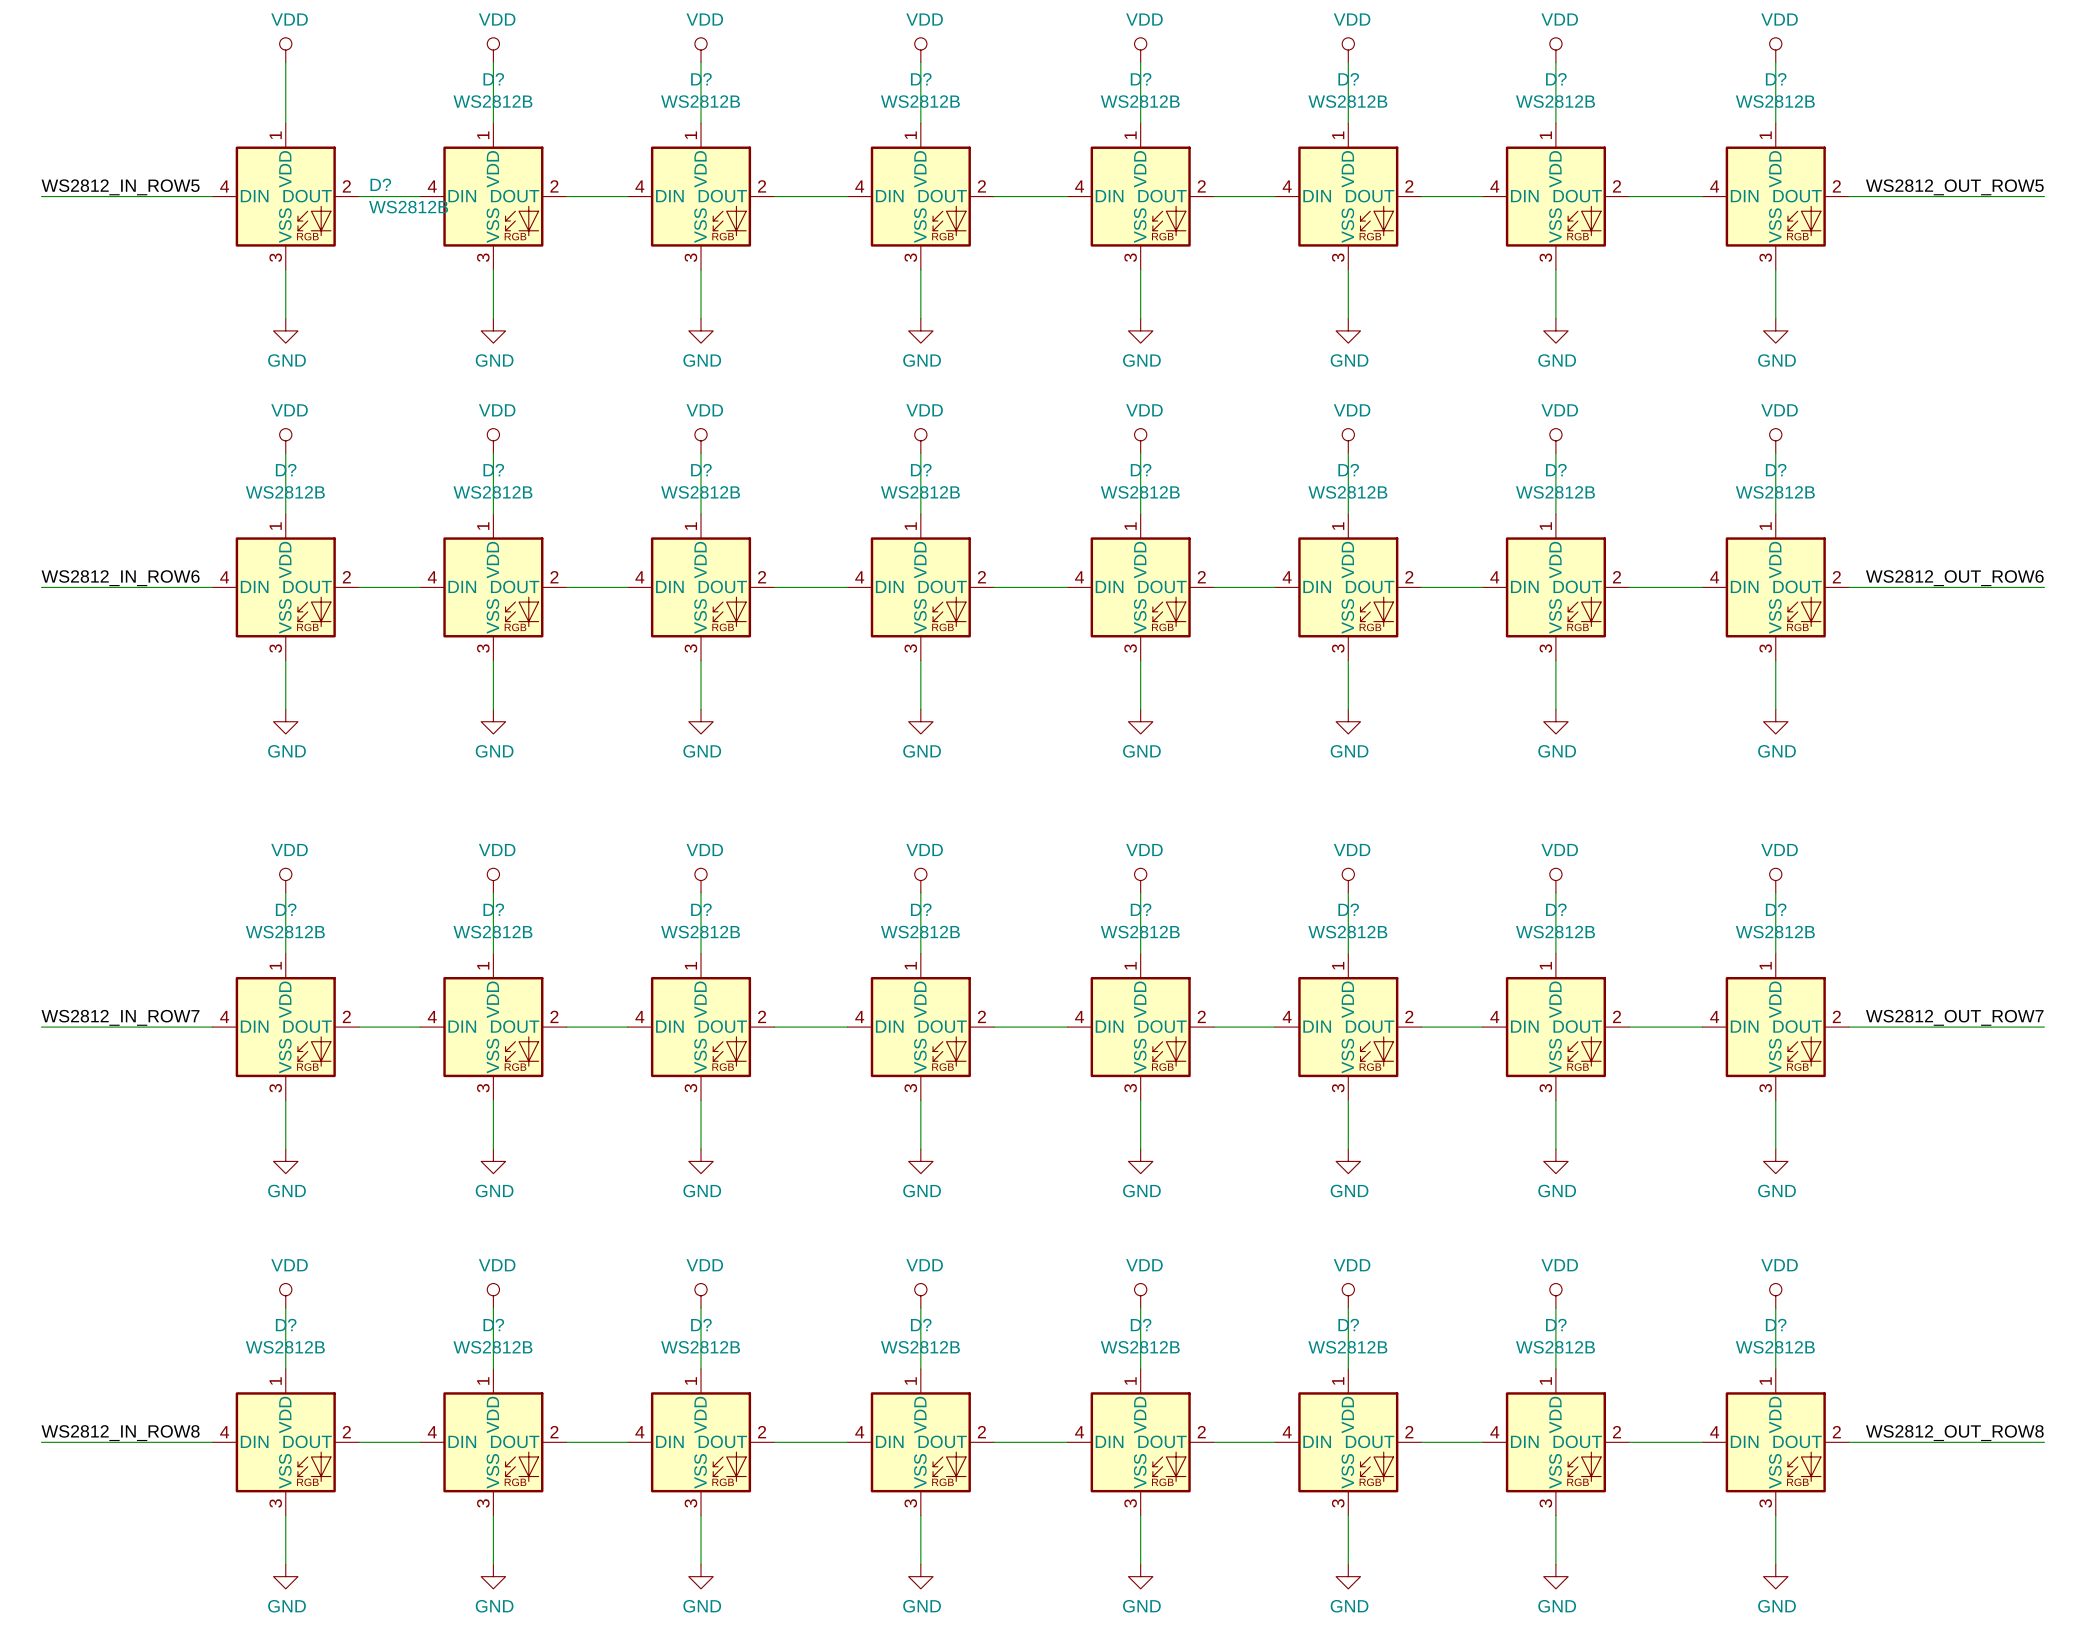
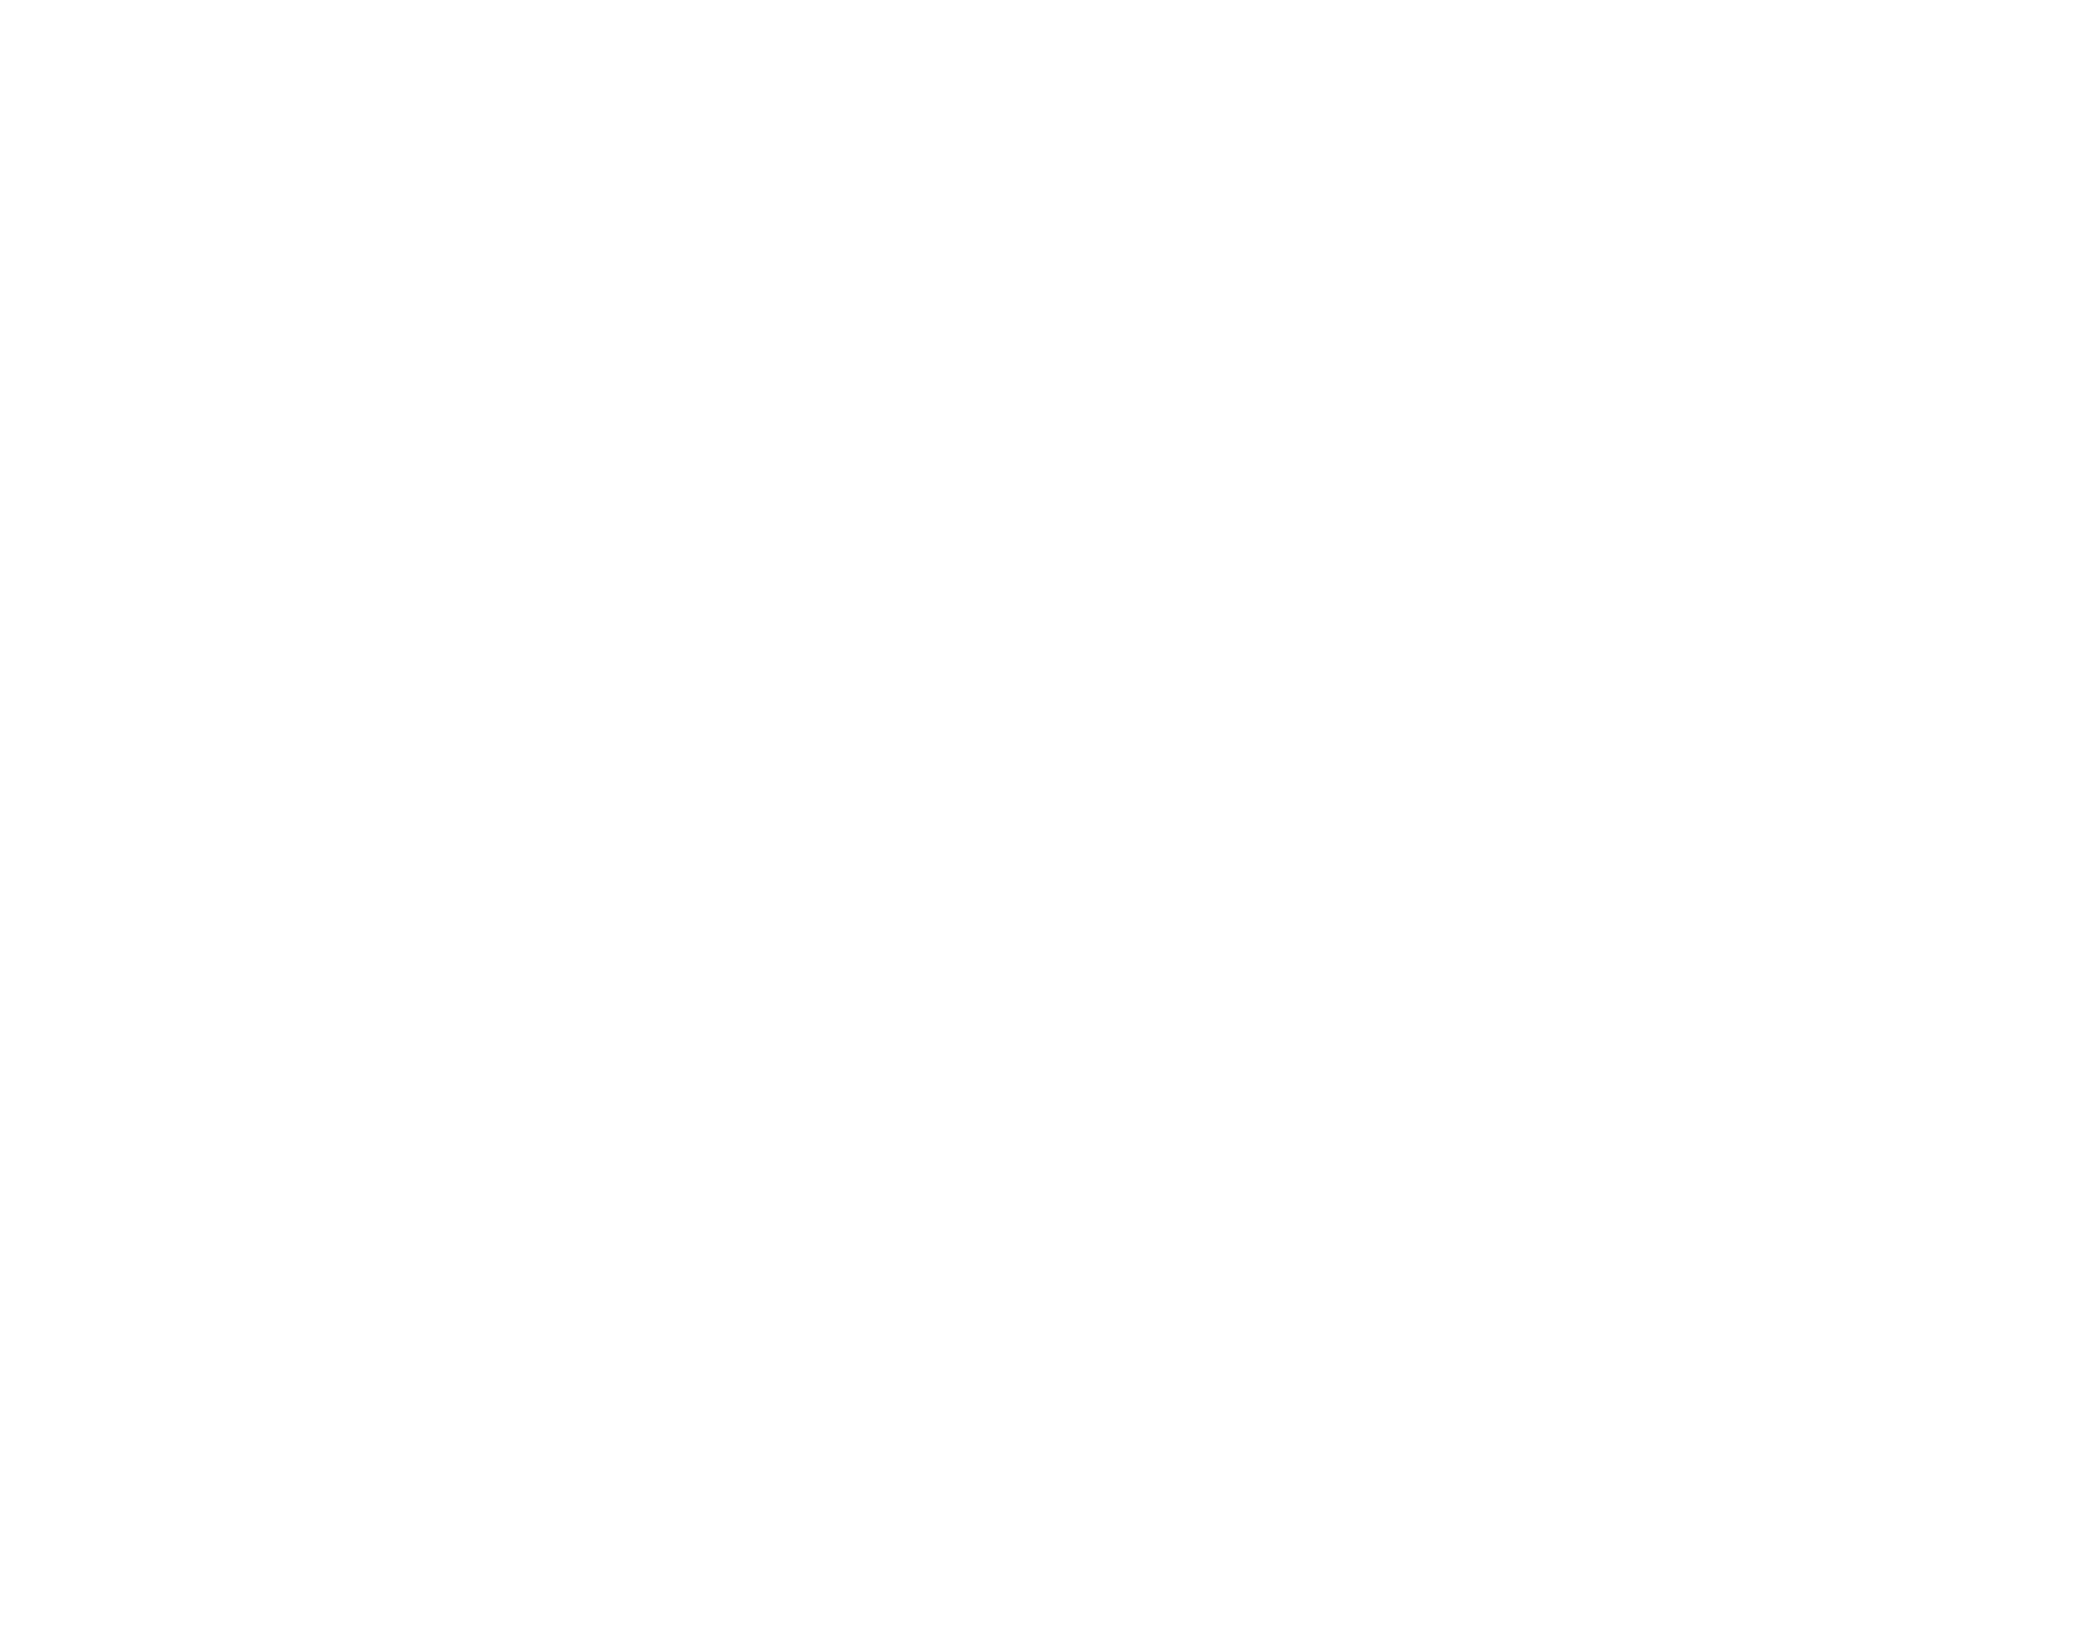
power symbol: VDD (285, 50) -> none
power symbol: VDD (493, 50) -> none
power symbol: VDD (701, 50) -> none
power symbol: VDD (920, 50) -> none
power symbol: VDD (1140, 50) -> none
power symbol: VDD (1348, 50) -> none
power symbol: VDD (1555, 50) -> none
power symbol: VDD (1775, 50) -> none
wire: (285, 62) (285, 123) -> none
wire: (493, 62) (493, 123) -> none
wire: (701, 62) (701, 123) -> none
wire: (920, 62) (920, 123) -> none
wire: (1140, 62) (1140, 123) -> none
wire: (1348, 62) (1348, 123) -> none
wire: (1555, 62) (1555, 123) -> none
wire: (1775, 62) (1775, 123) -> none
label: WS2812_IN_ROW5 (120, 187) -> none
label: WS2812_OUT_ROW5 (1954, 187) -> none
wire: (41, 196) (212, 196) -> none
D?: WS2812B (285, 196) -> none
wire: (359, 196) (420, 196) -> none
D?: WS2812B (493, 196) -> none
wire: (566, 196) (627, 196) -> none
D?: WS2812B (701, 196) -> none
wire: (774, 196) (847, 196) -> none
D?: WS2812B (920, 196) -> none
wire: (994, 196) (1067, 196) -> none
D?: WS2812B (1140, 196) -> none
wire: (1213, 196) (1275, 196) -> none
D?: WS2812B (1348, 196) -> none
wire: (1421, 196) (1482, 196) -> none
D?: WS2812B (1555, 196) -> none
wire: (1629, 196) (1702, 196) -> none
D?: WS2812B (1775, 196) -> none
wire: (1849, 196) (2044, 196) -> none
wire: (285, 269) (285, 318) -> none
wire: (493, 269) (493, 318) -> none
wire: (701, 269) (701, 318) -> none
wire: (920, 269) (920, 318) -> none
wire: (1140, 269) (1140, 318) -> none
wire: (1348, 269) (1348, 318) -> none
wire: (1555, 269) (1555, 318) -> none
wire: (1775, 269) (1775, 318) -> none
power symbol: GND (285, 330) -> none
power symbol: GND (493, 330) -> none
power symbol: GND (701, 330) -> none
power symbol: GND (920, 330) -> none
power symbol: GND (1140, 330) -> none
power symbol: GND (1348, 330) -> none
power symbol: GND (1555, 330) -> none
power symbol: GND (1775, 330) -> none
power symbol: VDD (285, 440) -> none
power symbol: VDD (493, 440) -> none
power symbol: VDD (701, 440) -> none
power symbol: VDD (920, 440) -> none
power symbol: VDD (1140, 440) -> none
power symbol: VDD (1348, 440) -> none
power symbol: VDD (1555, 440) -> none
power symbol: VDD (1775, 440) -> none
wire: (285, 453) (285, 514) -> none
wire: (493, 453) (493, 514) -> none
wire: (701, 453) (701, 514) -> none
wire: (920, 453) (920, 514) -> none
wire: (1140, 453) (1140, 514) -> none
wire: (1348, 453) (1348, 514) -> none
wire: (1555, 453) (1555, 514) -> none
wire: (1775, 453) (1775, 514) -> none
label: WS2812_IN_ROW6 (120, 578) -> none
label: WS2812_OUT_ROW6 (1954, 578) -> none
wire: (41, 587) (212, 587) -> none
D?: WS2812B (285, 587) -> none
wire: (359, 587) (420, 587) -> none
D?: WS2812B (493, 587) -> none
wire: (566, 587) (627, 587) -> none
D?: WS2812B (701, 587) -> none
wire: (774, 587) (847, 587) -> none
D?: WS2812B (920, 587) -> none
wire: (994, 587) (1067, 587) -> none
D?: WS2812B (1140, 587) -> none
wire: (1213, 587) (1275, 587) -> none
D?: WS2812B (1348, 587) -> none
wire: (1421, 587) (1482, 587) -> none
D?: WS2812B (1555, 587) -> none
wire: (1629, 587) (1702, 587) -> none
D?: WS2812B (1775, 587) -> none
wire: (1849, 587) (2044, 587) -> none
wire: (285, 660) (285, 709) -> none
wire: (493, 660) (493, 709) -> none
wire: (701, 660) (701, 709) -> none
wire: (920, 660) (920, 709) -> none
wire: (1140, 660) (1140, 709) -> none
wire: (1348, 660) (1348, 709) -> none
wire: (1555, 660) (1555, 709) -> none
wire: (1775, 660) (1775, 709) -> none
power symbol: GND (285, 721) -> none
power symbol: GND (493, 721) -> none
power symbol: GND (701, 721) -> none
power symbol: GND (920, 721) -> none
power symbol: GND (1140, 721) -> none
power symbol: GND (1348, 721) -> none
power symbol: GND (1555, 721) -> none
power symbol: GND (1775, 721) -> none
power symbol: VDD (285, 880) -> none
power symbol: VDD (493, 880) -> none
power symbol: VDD (701, 880) -> none
power symbol: VDD (920, 880) -> none
power symbol: VDD (1140, 880) -> none
power symbol: VDD (1348, 880) -> none
power symbol: VDD (1555, 880) -> none
power symbol: VDD (1775, 880) -> none
wire: (285, 892) (285, 953) -> none
wire: (493, 892) (493, 953) -> none
wire: (701, 892) (701, 953) -> none
wire: (920, 892) (920, 953) -> none
wire: (1140, 892) (1140, 953) -> none
wire: (1348, 892) (1348, 953) -> none
wire: (1555, 892) (1555, 953) -> none
wire: (1775, 892) (1775, 953) -> none
label: WS2812_IN_ROW7 (120, 1017) -> none
label: WS2812_OUT_ROW7 (1954, 1017) -> none
wire: (41, 1027) (212, 1027) -> none
D?: WS2812B (285, 1027) -> none
wire: (359, 1027) (420, 1027) -> none
D?: WS2812B (493, 1027) -> none
wire: (566, 1027) (627, 1027) -> none
D?: WS2812B (701, 1027) -> none
wire: (774, 1027) (847, 1027) -> none
D?: WS2812B (920, 1027) -> none
wire: (994, 1027) (1067, 1027) -> none
D?: WS2812B (1140, 1027) -> none
wire: (1213, 1027) (1275, 1027) -> none
D?: WS2812B (1348, 1027) -> none
wire: (1421, 1027) (1482, 1027) -> none
D?: WS2812B (1555, 1027) -> none
wire: (1629, 1027) (1702, 1027) -> none
D?: WS2812B (1775, 1027) -> none
wire: (1849, 1027) (2044, 1027) -> none
wire: (285, 1100) (285, 1149) -> none
wire: (493, 1100) (493, 1149) -> none
wire: (701, 1100) (701, 1149) -> none
wire: (920, 1100) (920, 1149) -> none
wire: (1140, 1100) (1140, 1149) -> none
wire: (1348, 1100) (1348, 1149) -> none
wire: (1555, 1100) (1555, 1149) -> none
wire: (1775, 1100) (1775, 1149) -> none
power symbol: GND (285, 1161) -> none
power symbol: GND (493, 1161) -> none
power symbol: GND (701, 1161) -> none
power symbol: GND (920, 1161) -> none
power symbol: GND (1140, 1161) -> none
power symbol: GND (1348, 1161) -> none
power symbol: GND (1555, 1161) -> none
power symbol: GND (1775, 1161) -> none
power symbol: VDD (285, 1295) -> none
power symbol: VDD (493, 1295) -> none
power symbol: VDD (701, 1295) -> none
power symbol: VDD (920, 1295) -> none
power symbol: VDD (1140, 1295) -> none
power symbol: VDD (1348, 1295) -> none
power symbol: VDD (1555, 1295) -> none
power symbol: VDD (1775, 1295) -> none
wire: (285, 1307) (285, 1369) -> none
wire: (493, 1307) (493, 1369) -> none
wire: (701, 1307) (701, 1369) -> none
wire: (920, 1307) (920, 1369) -> none
wire: (1140, 1307) (1140, 1369) -> none
wire: (1348, 1307) (1348, 1369) -> none
wire: (1555, 1307) (1555, 1369) -> none
wire: (1775, 1307) (1775, 1369) -> none
label: WS2812_IN_ROW8 (120, 1433) -> none
label: WS2812_OUT_ROW8 (1954, 1433) -> none
wire: (41, 1442) (212, 1442) -> none
D?: WS2812B (285, 1442) -> none
wire: (359, 1442) (420, 1442) -> none
D?: WS2812B (493, 1442) -> none
wire: (566, 1442) (627, 1442) -> none
D?: WS2812B (701, 1442) -> none
wire: (774, 1442) (847, 1442) -> none
D?: WS2812B (920, 1442) -> none
wire: (994, 1442) (1067, 1442) -> none
D?: WS2812B (1140, 1442) -> none
wire: (1213, 1442) (1275, 1442) -> none
D?: WS2812B (1348, 1442) -> none
wire: (1421, 1442) (1482, 1442) -> none
D?: WS2812B (1555, 1442) -> none
wire: (1629, 1442) (1702, 1442) -> none
D?: WS2812B (1775, 1442) -> none
wire: (1849, 1442) (2044, 1442) -> none
wire: (285, 1515) (285, 1564) -> none
wire: (493, 1515) (493, 1564) -> none
wire: (701, 1515) (701, 1564) -> none
wire: (920, 1515) (920, 1564) -> none
wire: (1140, 1515) (1140, 1564) -> none
wire: (1348, 1515) (1348, 1564) -> none
wire: (1555, 1515) (1555, 1564) -> none
wire: (1775, 1515) (1775, 1564) -> none
power symbol: GND (285, 1576) -> none
power symbol: GND (493, 1576) -> none
power symbol: GND (701, 1576) -> none
power symbol: GND (920, 1576) -> none
power symbol: GND (1140, 1576) -> none
power symbol: GND (1348, 1576) -> none
power symbol: GND (1555, 1576) -> none
power symbol: GND (1775, 1576) -> none

